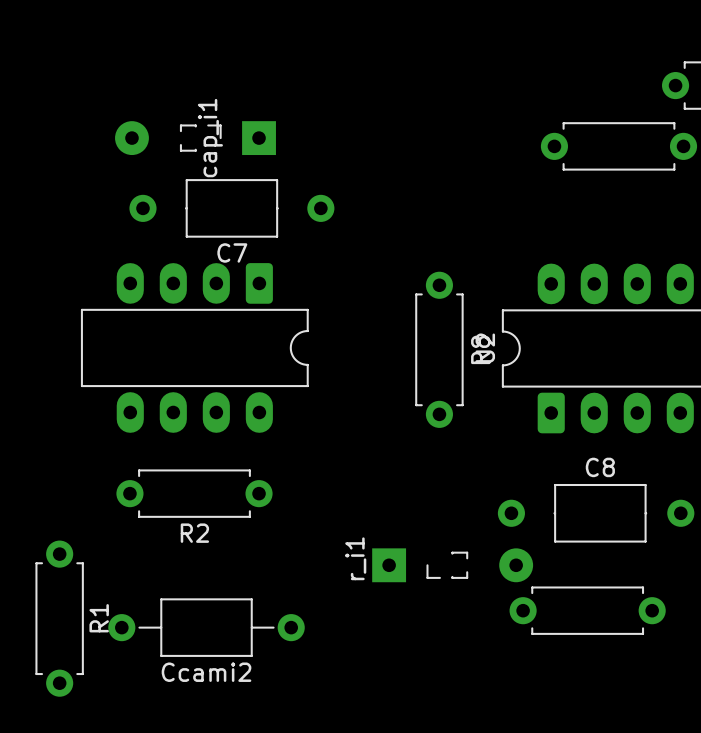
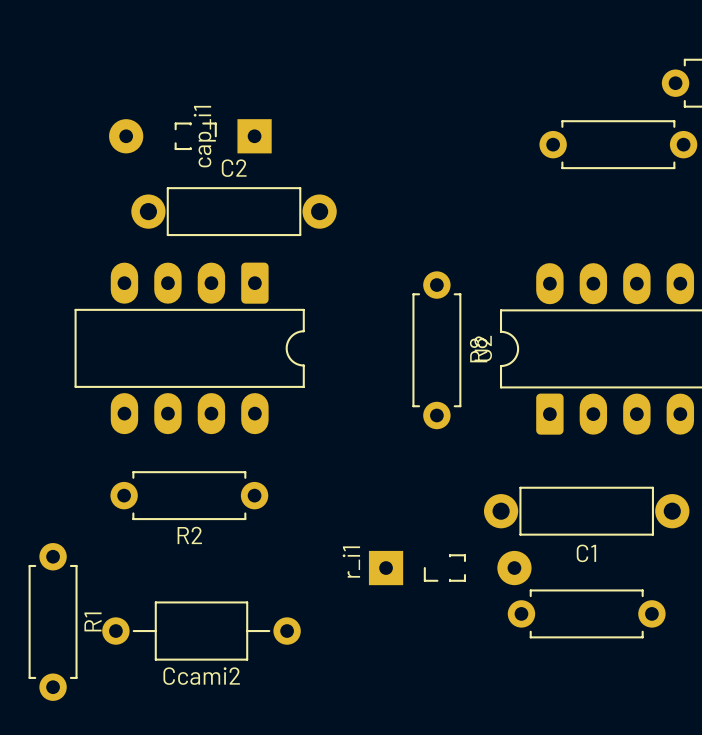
C7: (231, 208) -> none
C2: none -> (234, 211)
C1: none -> (586, 511)
C8: (596, 513) -> none

